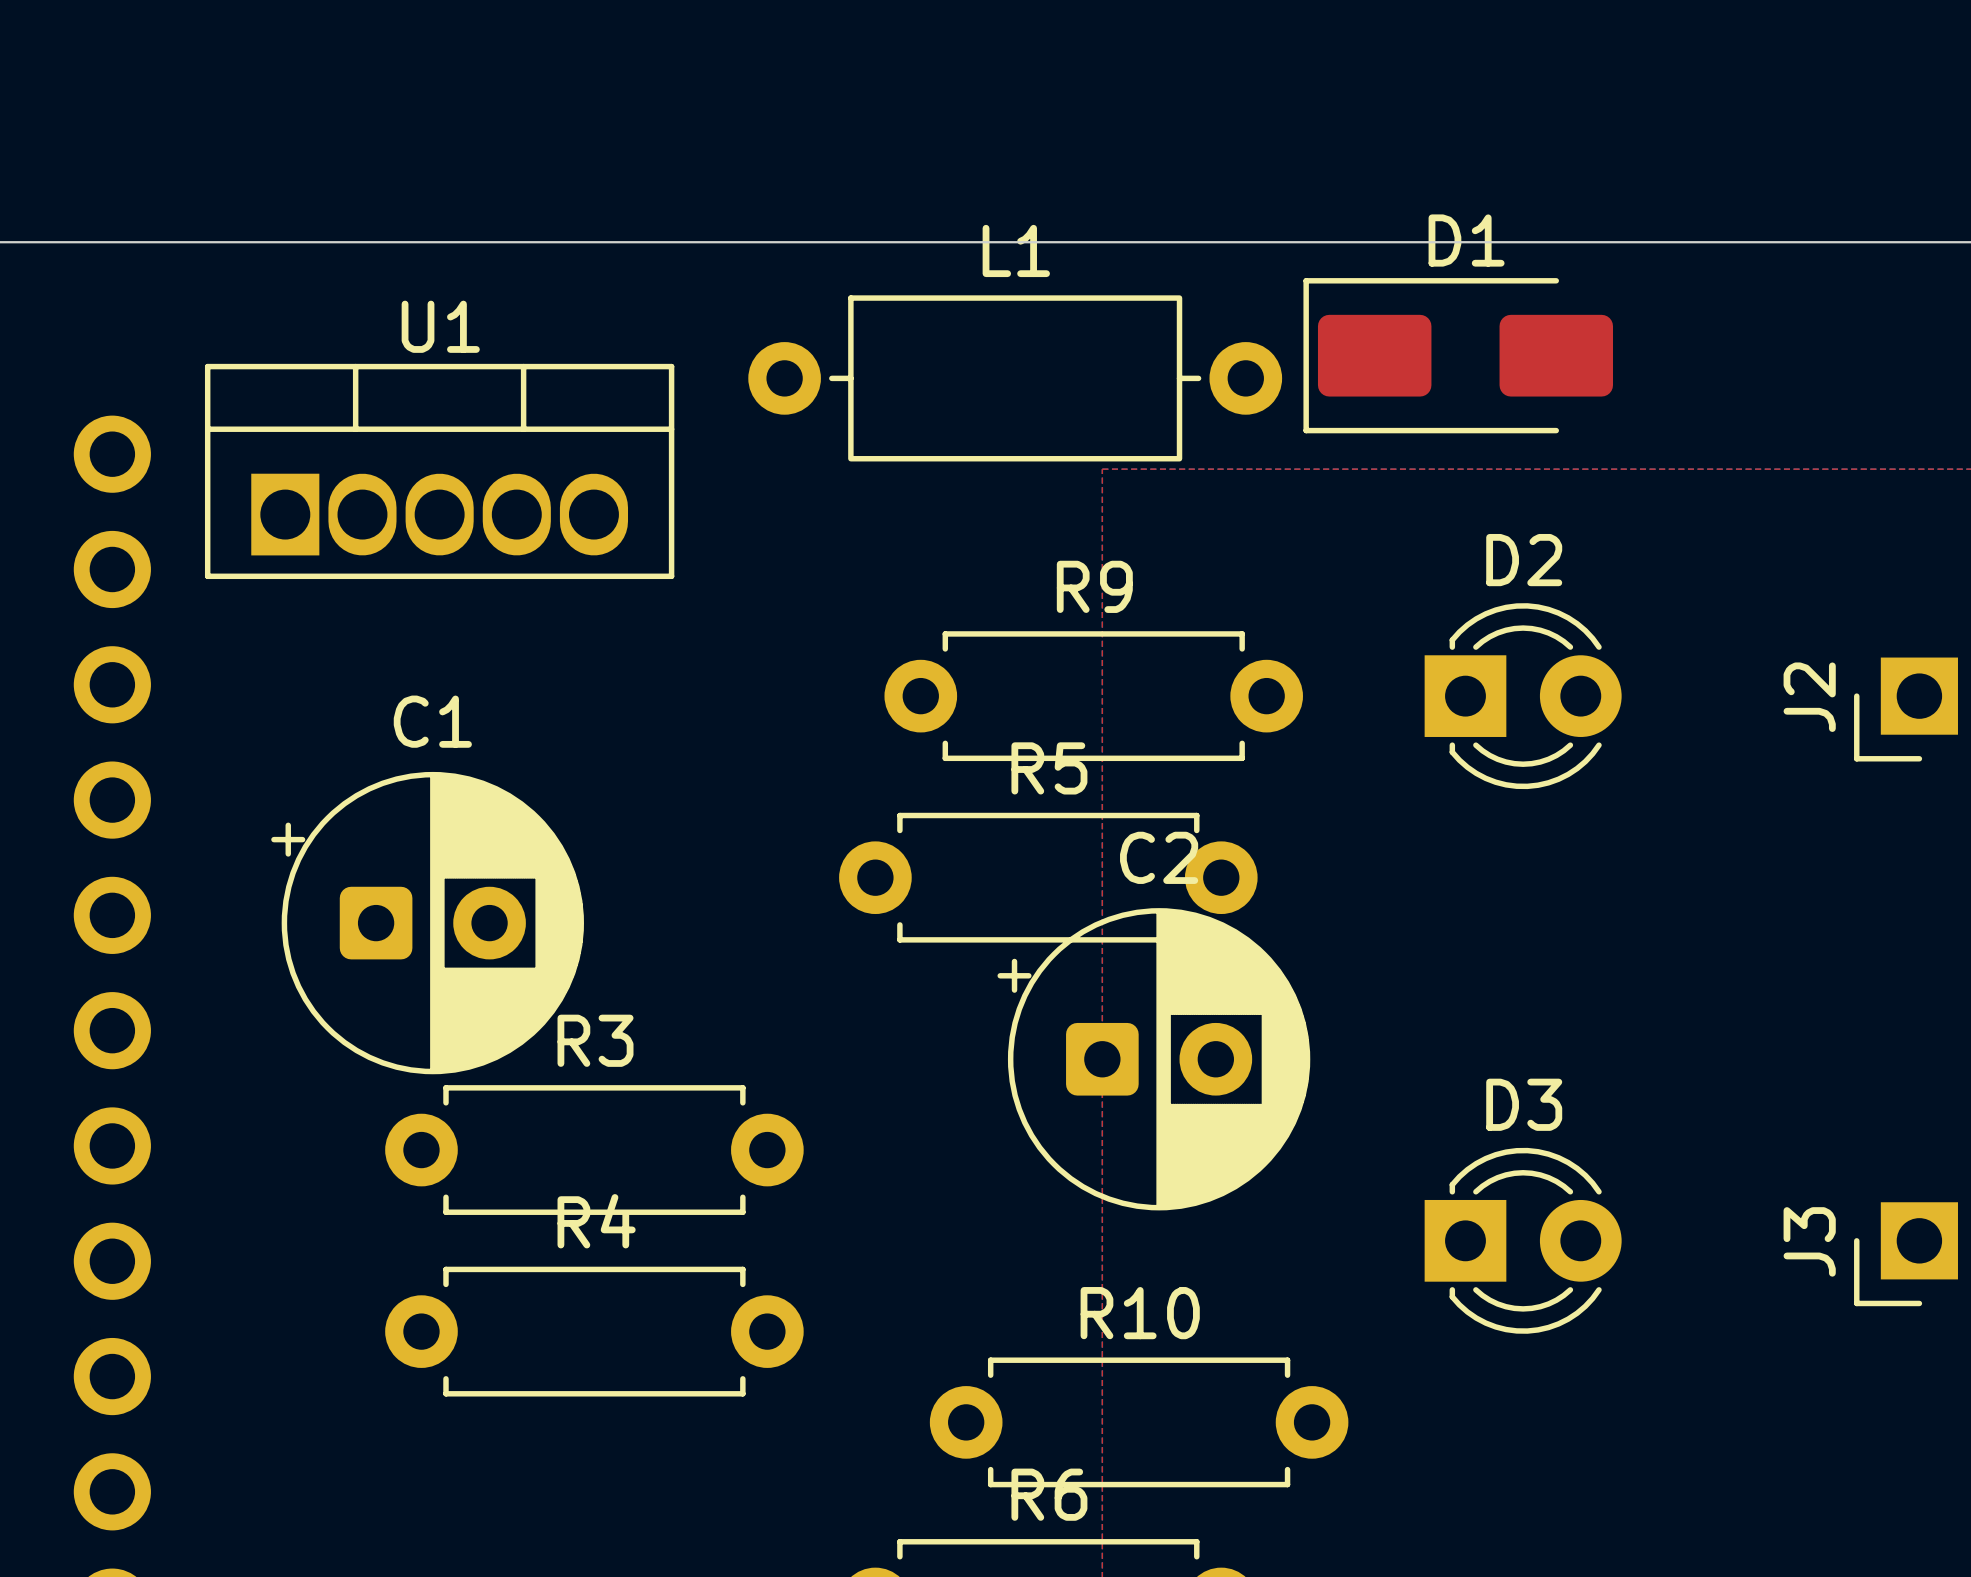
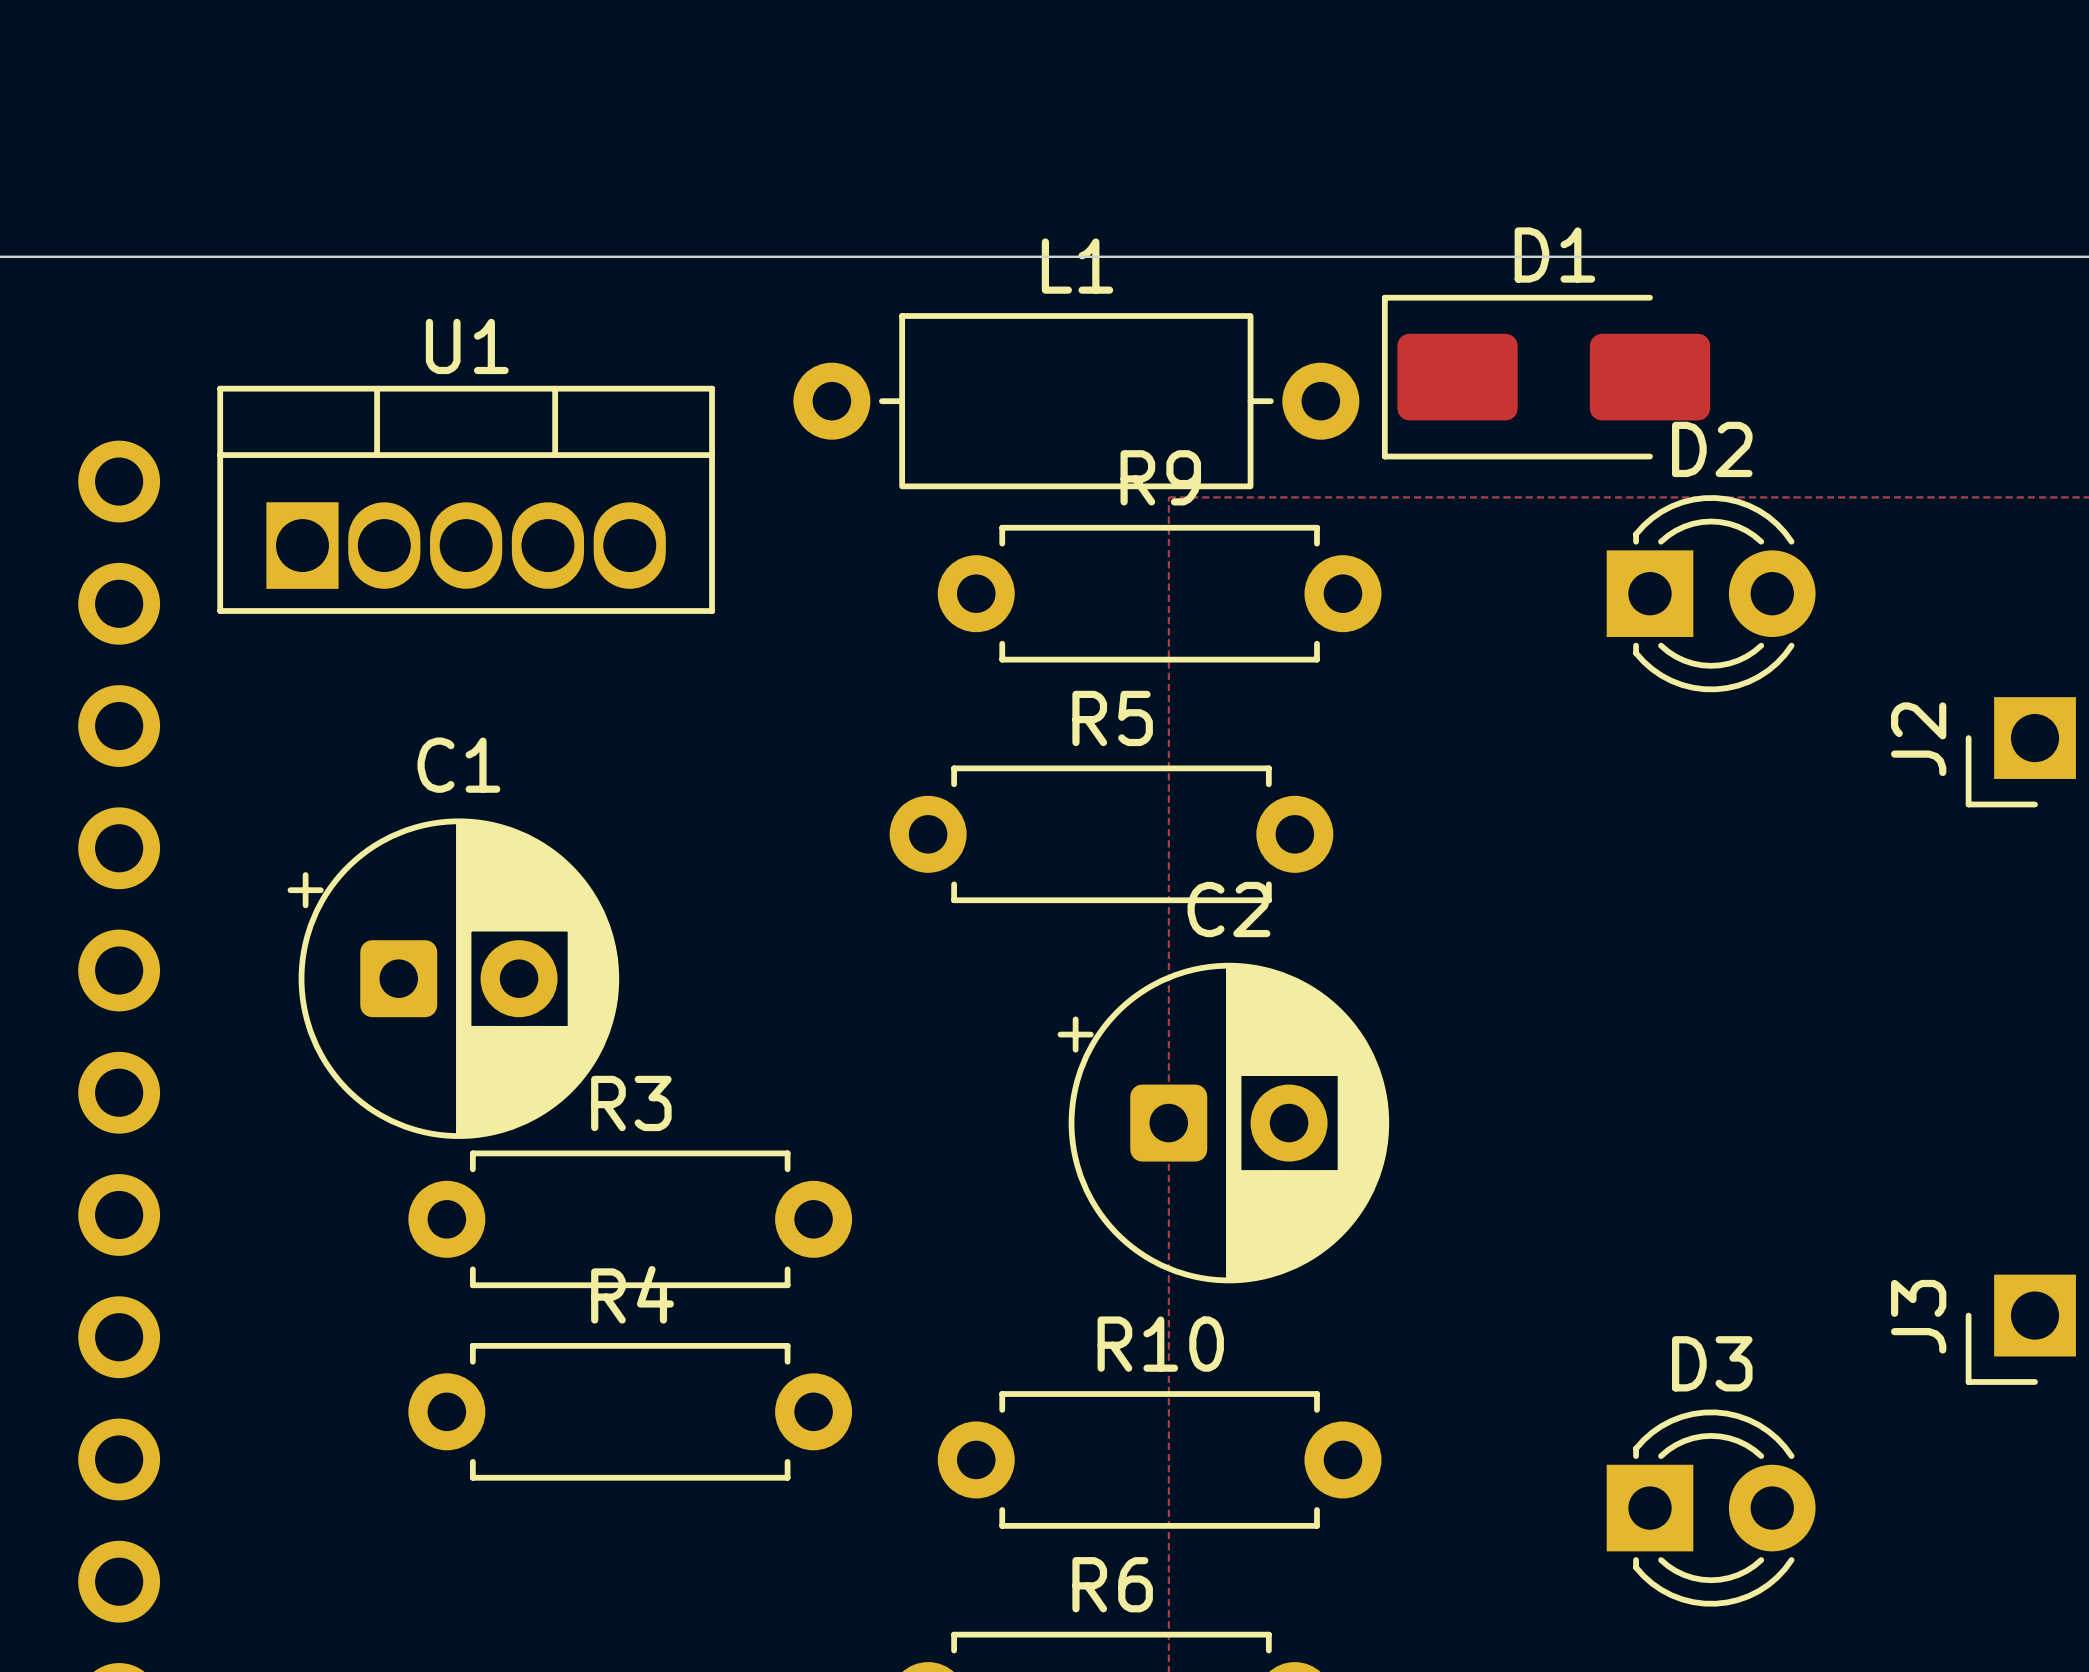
R9 position: (1093, 696) -> (1159, 593)
D2 position: (1523, 696) -> (1711, 593)
R5 position: (1048, 877) -> (1111, 834)
D3 position: (1523, 1240) -> (1711, 1508)
R10 position: (1139, 1422) -> (1159, 1459)

